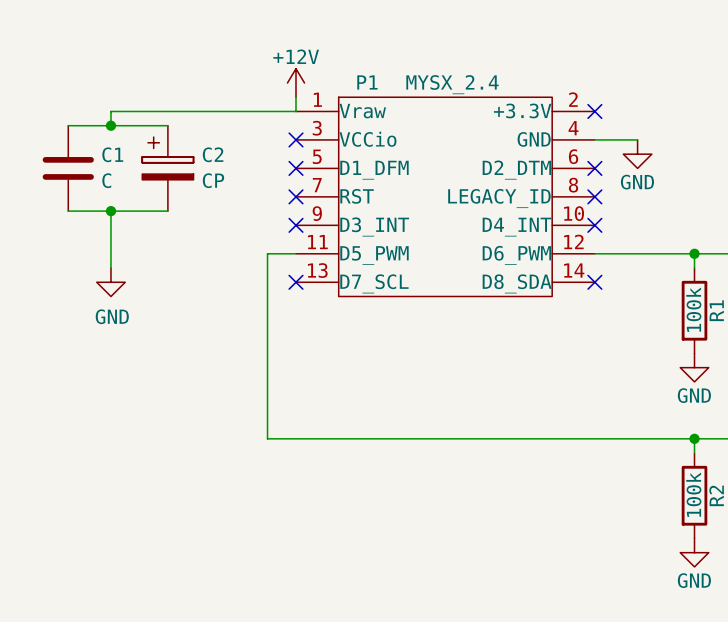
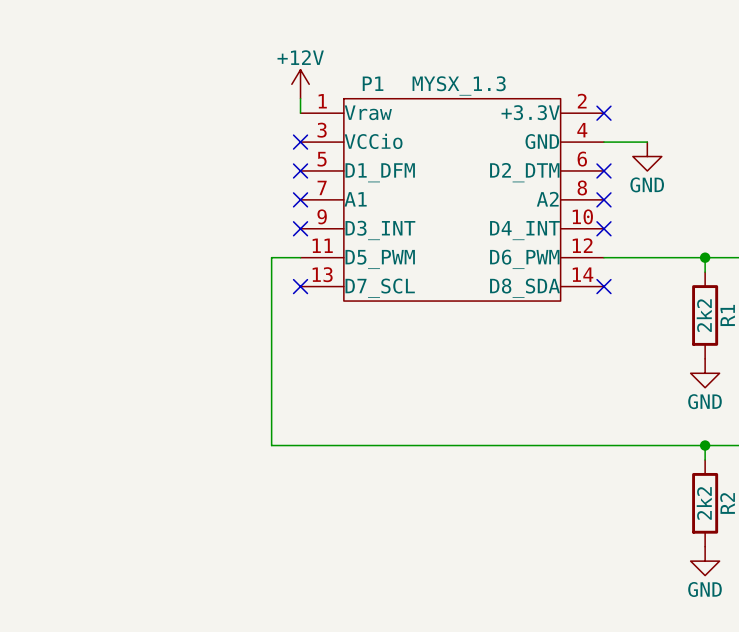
P1 value: MYSX_2.4 (452, 84) -> MYSX_1.3 (459, 85)
wire: (296, 111) (110, 111) (110, 125) -> none
wire: (68, 125) (167, 125) -> none
junction: (110, 125) -> none
C1: C (68, 168) -> none
C2: CP (167, 168) -> none
P1 pin name: RST (357, 196) -> A1 (355, 199)
P1 pin name: LEGACY_ID (499, 198) -> A2 (547, 199)
wire: (68, 211) (167, 211) -> none
wire: (110, 211) (110, 268) -> none
junction: (110, 211) -> none
power symbol: GND (110, 282) -> none
R1 value: 100k (693, 309) -> 2k2 (704, 315)
R2 value: 100k (693, 494) -> 2k2 (704, 503)

